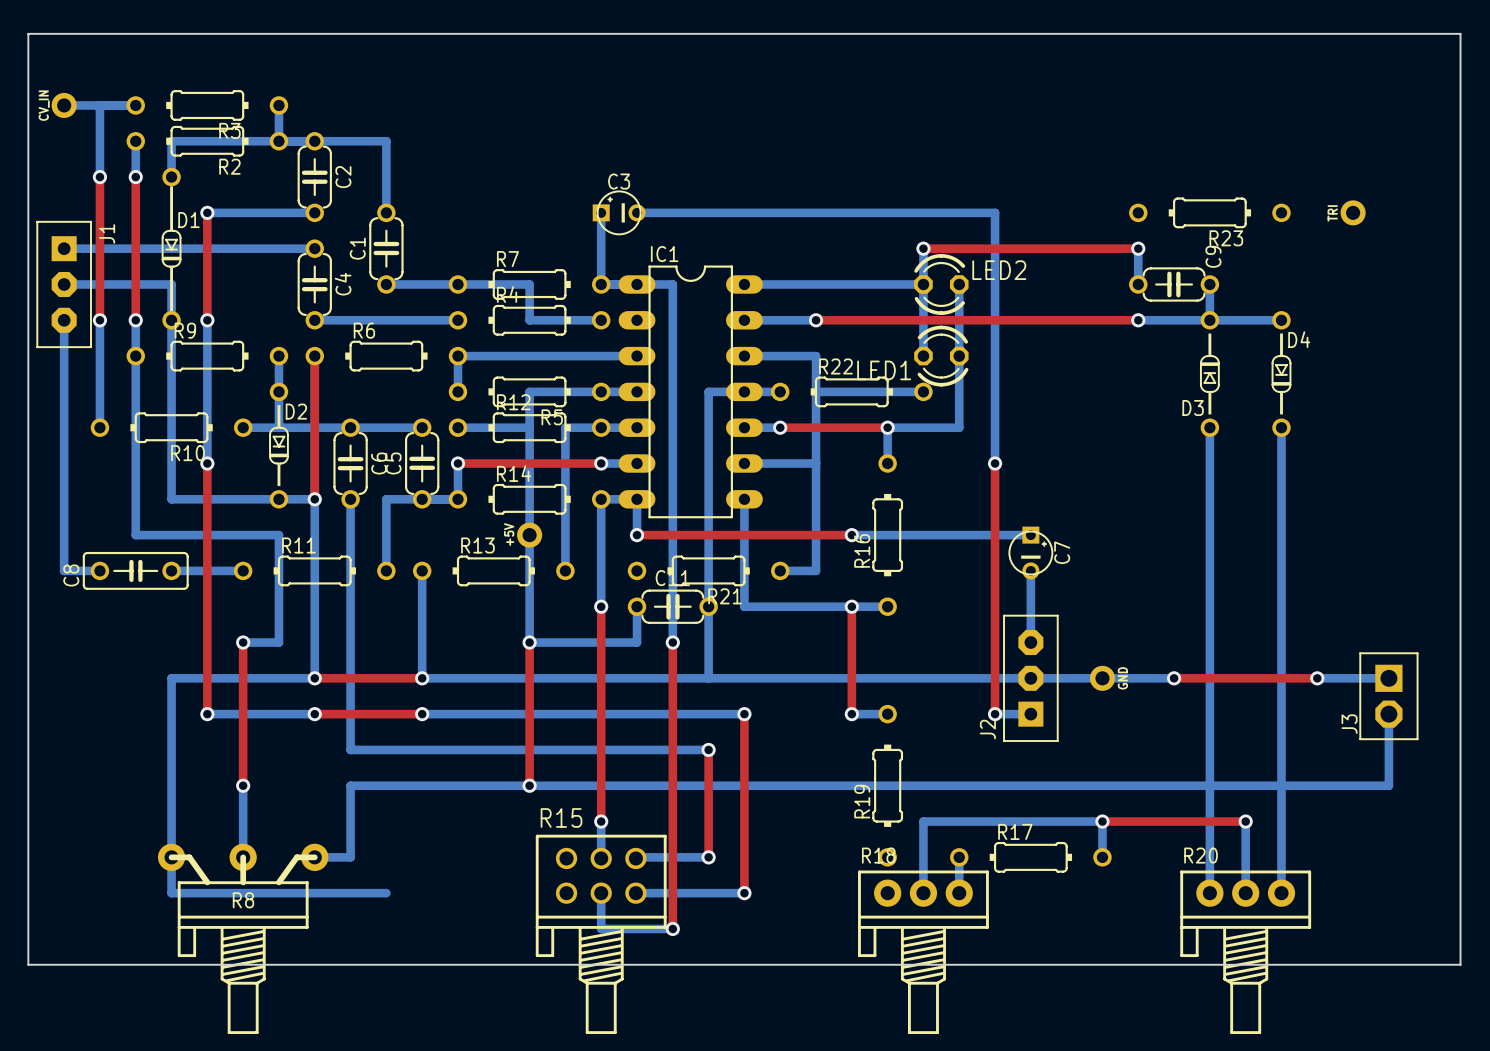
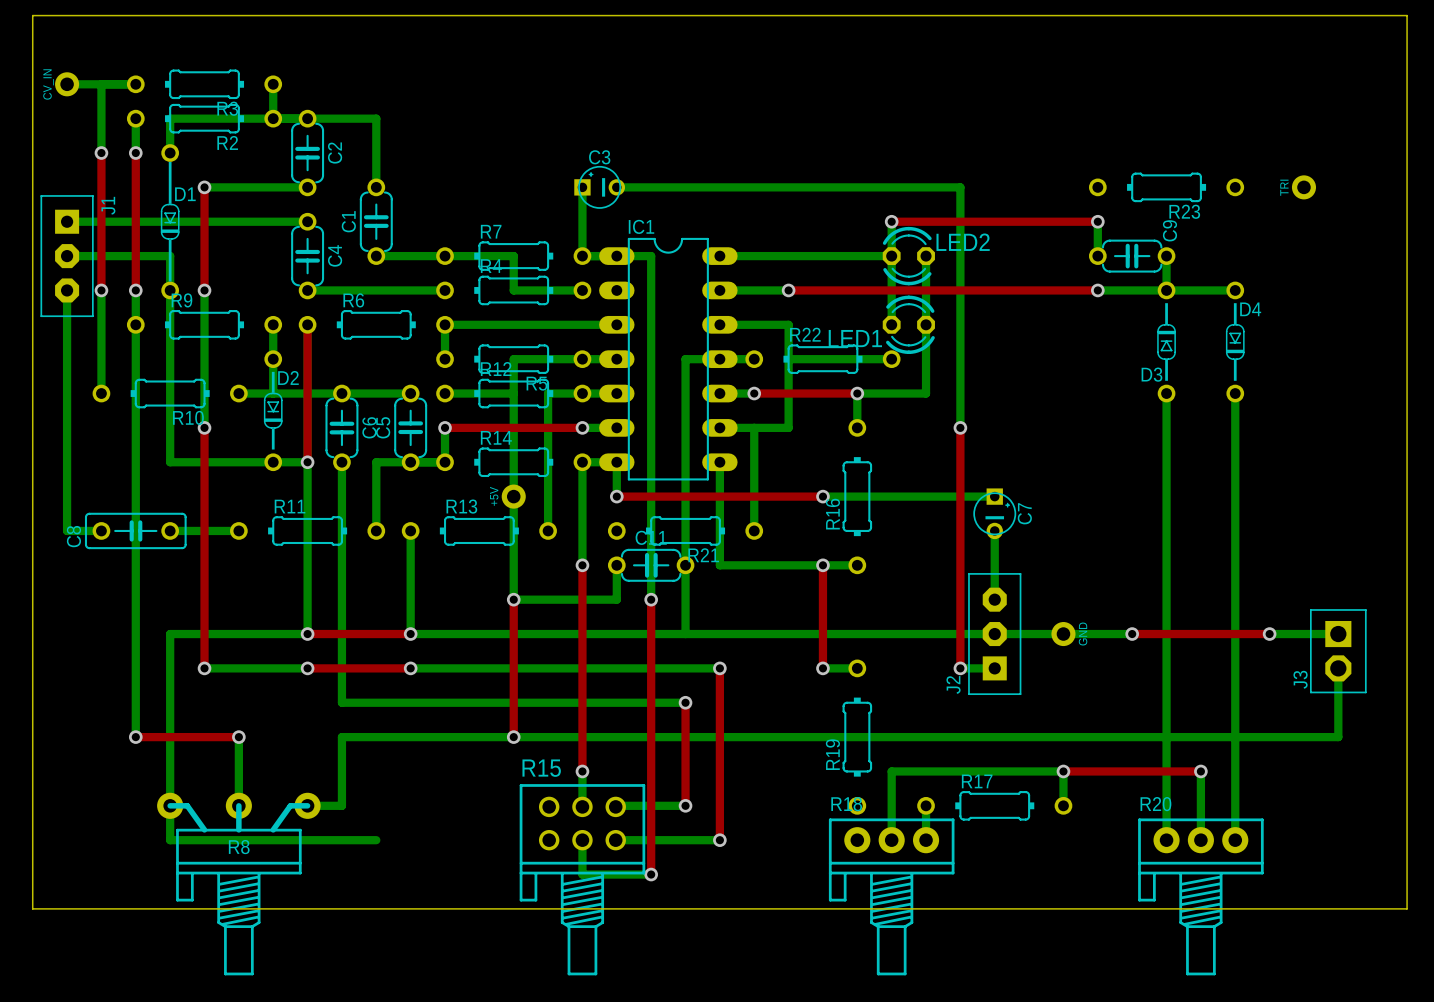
bottom track: (816, 463) (816, 570) (780, 570) -> (754, 427) (754, 530)
bottom track: (135, 535) (278, 535) (278, 642) (243, 642) -> (135, 496) (135, 737)
top track: (243, 642) (243, 785) -> (135, 737) (238, 737)
via: (243, 642) -> none
via: none -> (135, 737)

